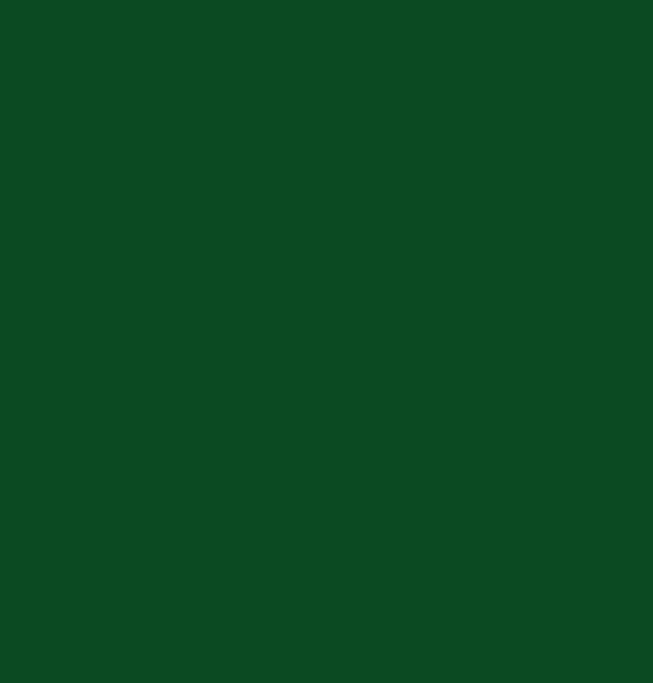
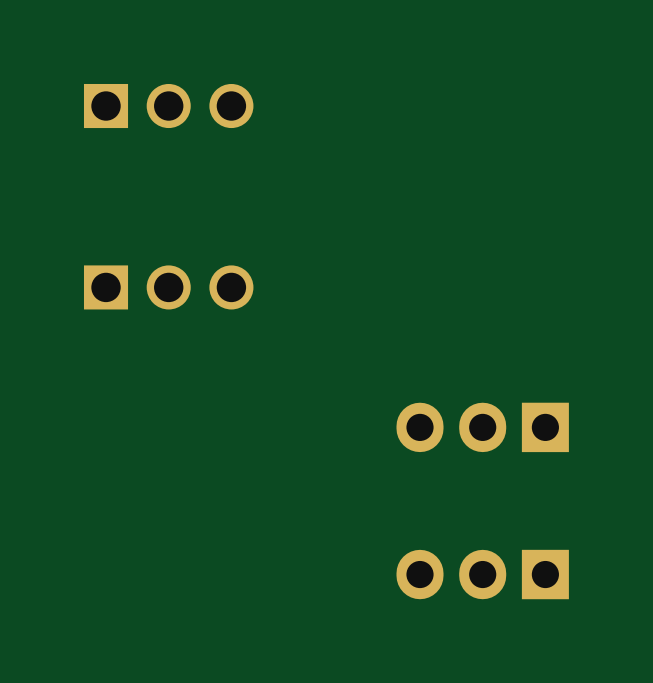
part: none -> (168, 106)
part: none -> (168, 287)
part: none -> (482, 427)
part: none -> (482, 574)

